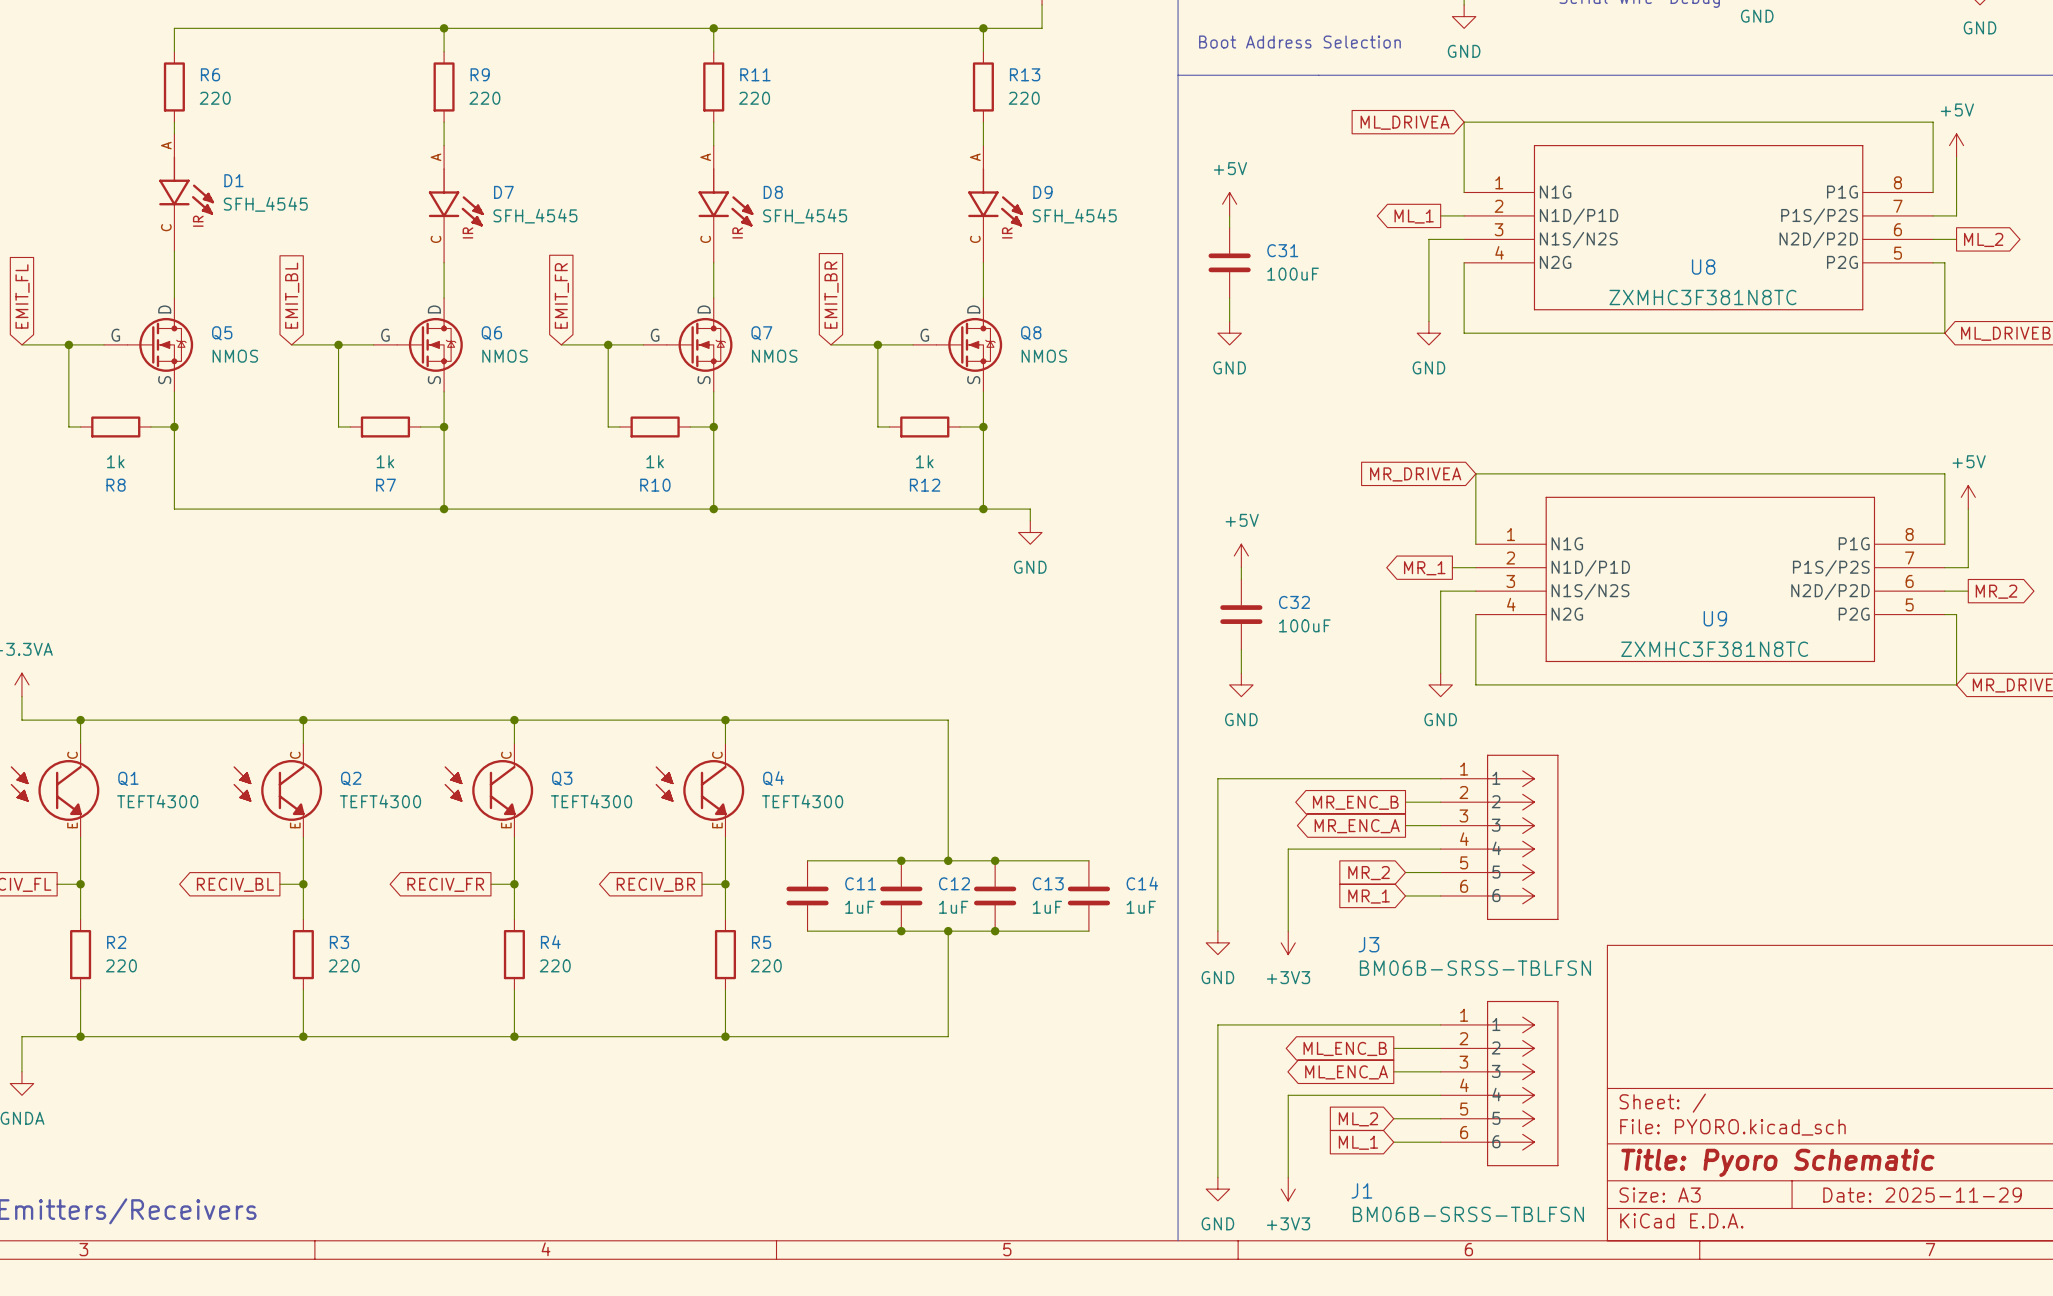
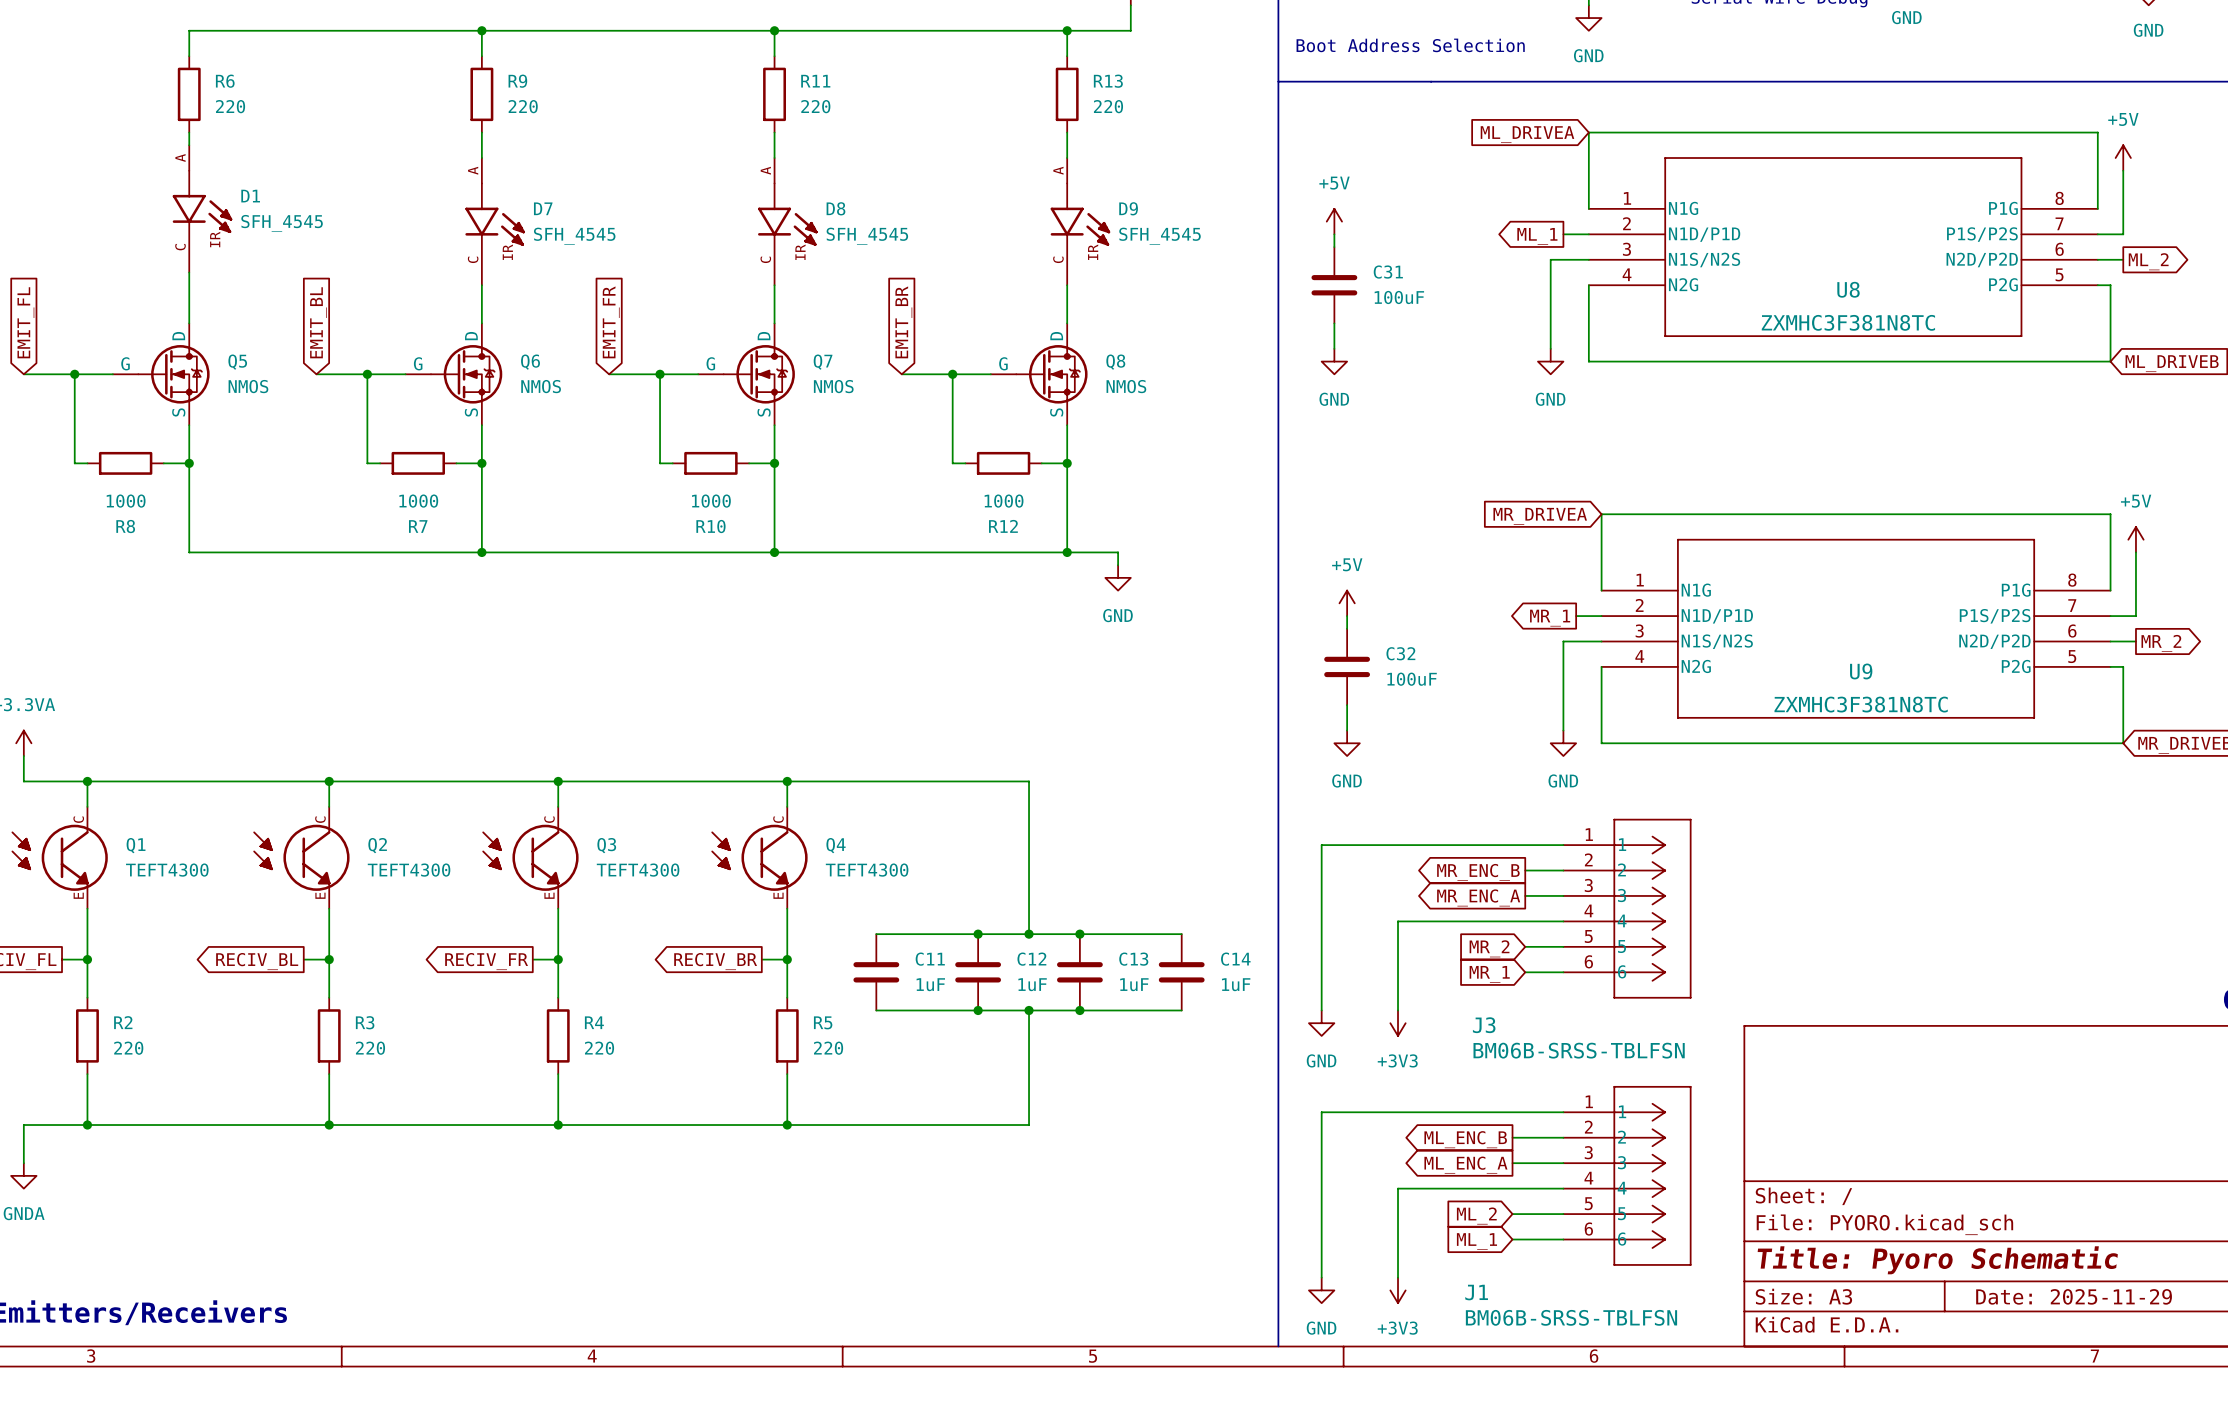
R8 value: 1k (115, 461) -> 1000 (126, 501)
R7 value: 1k (385, 461) -> 1000 (418, 501)
R10 value: 1k (655, 461) -> 1000 (711, 501)
R12 value: 1k (924, 461) -> 1000 (1004, 501)

